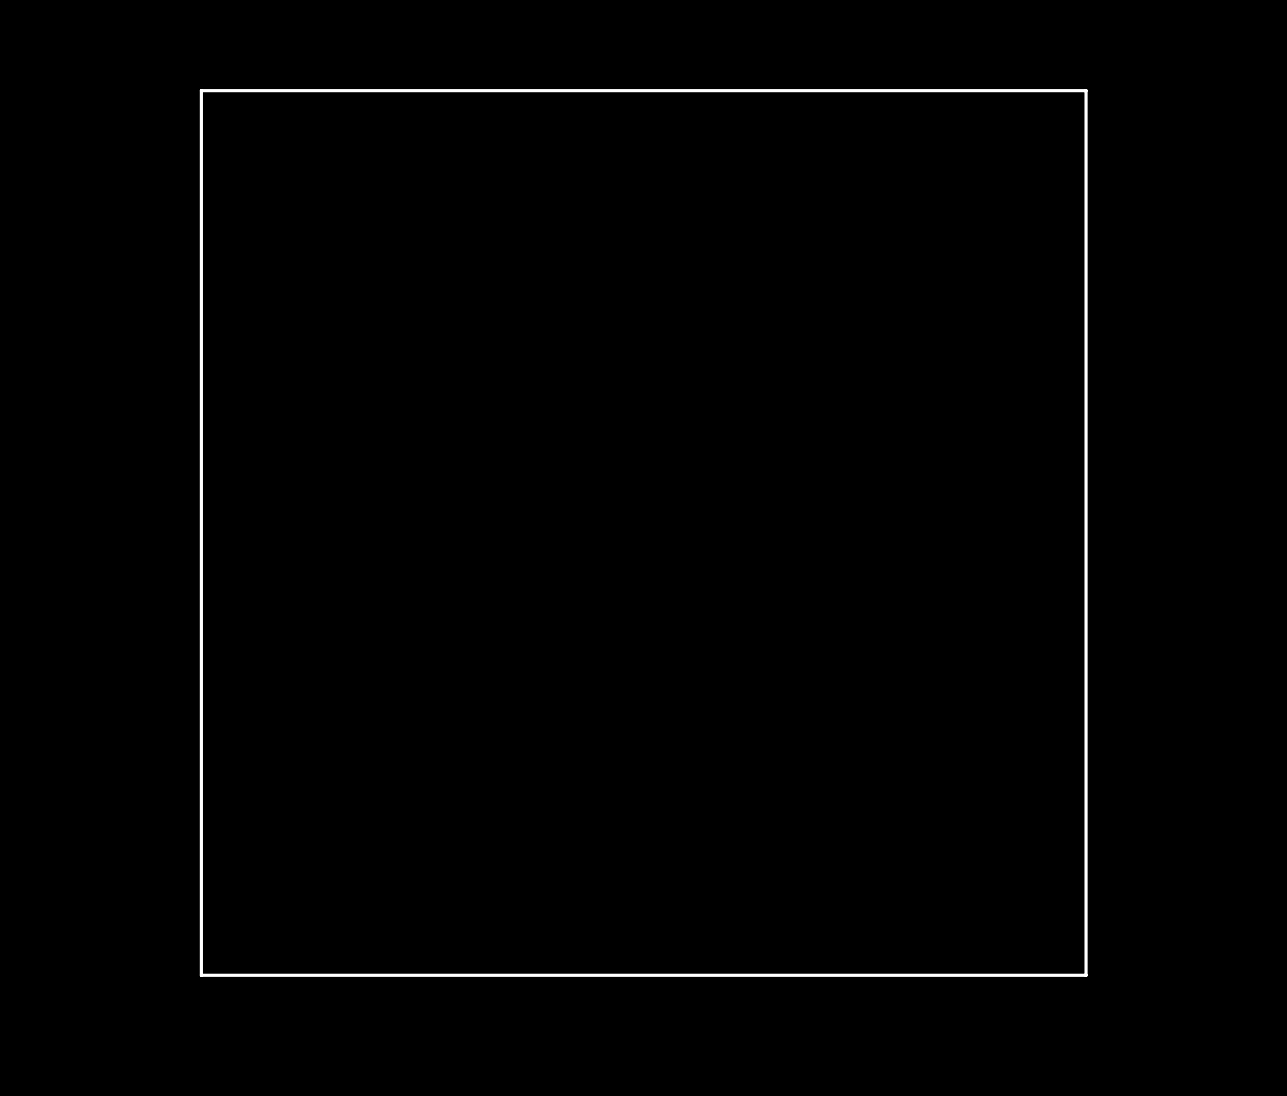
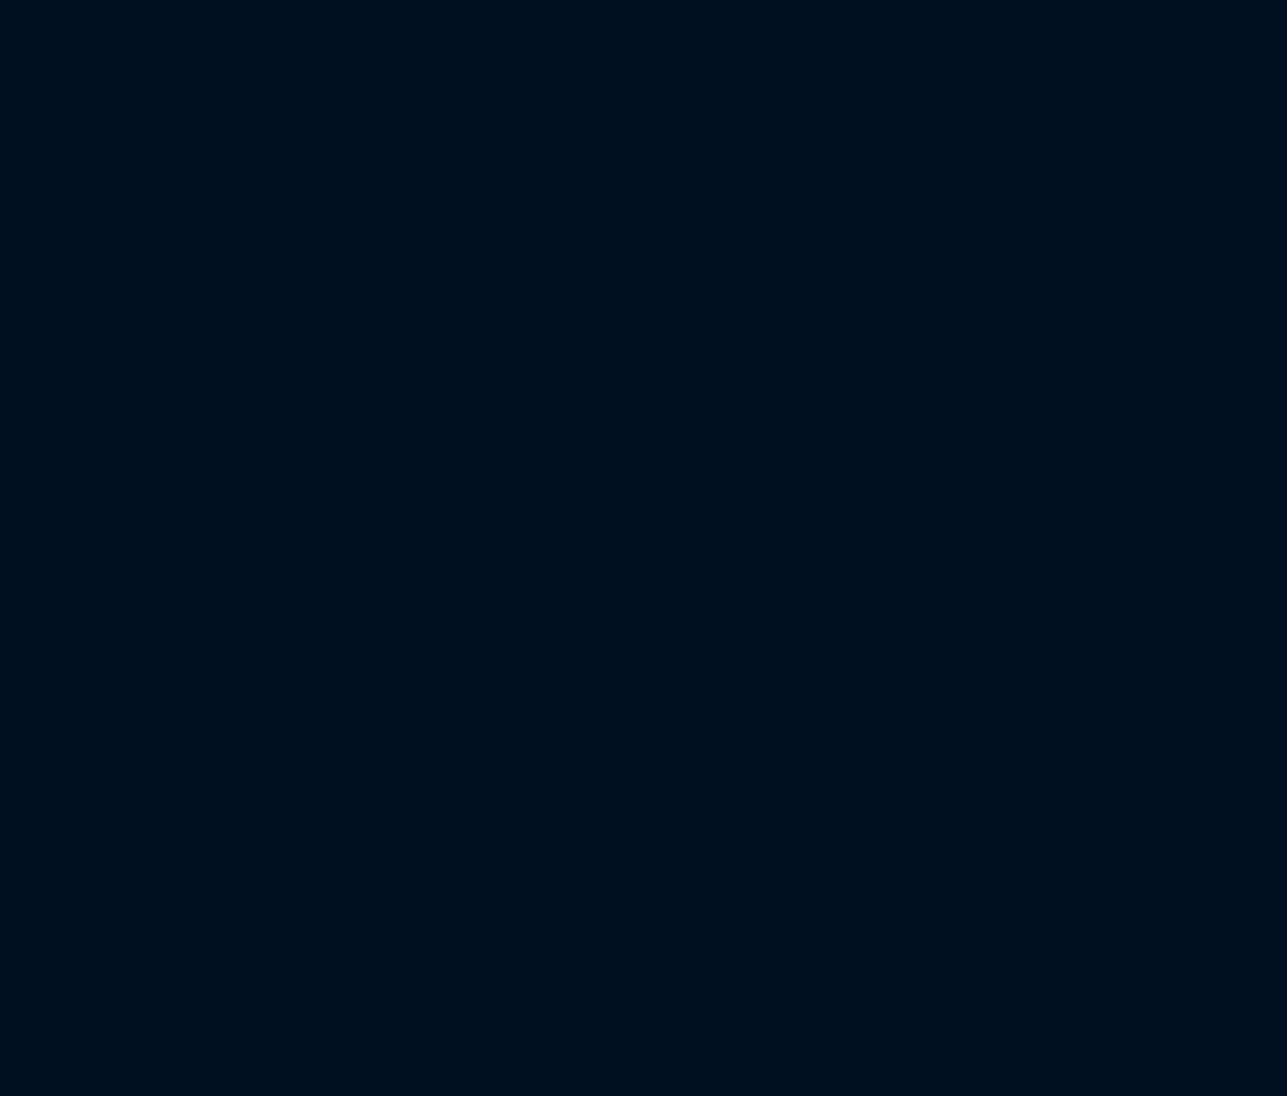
board edge: (201, 90) (1086, 90) (1086, 975) (201, 975) (201, 90) -> none

